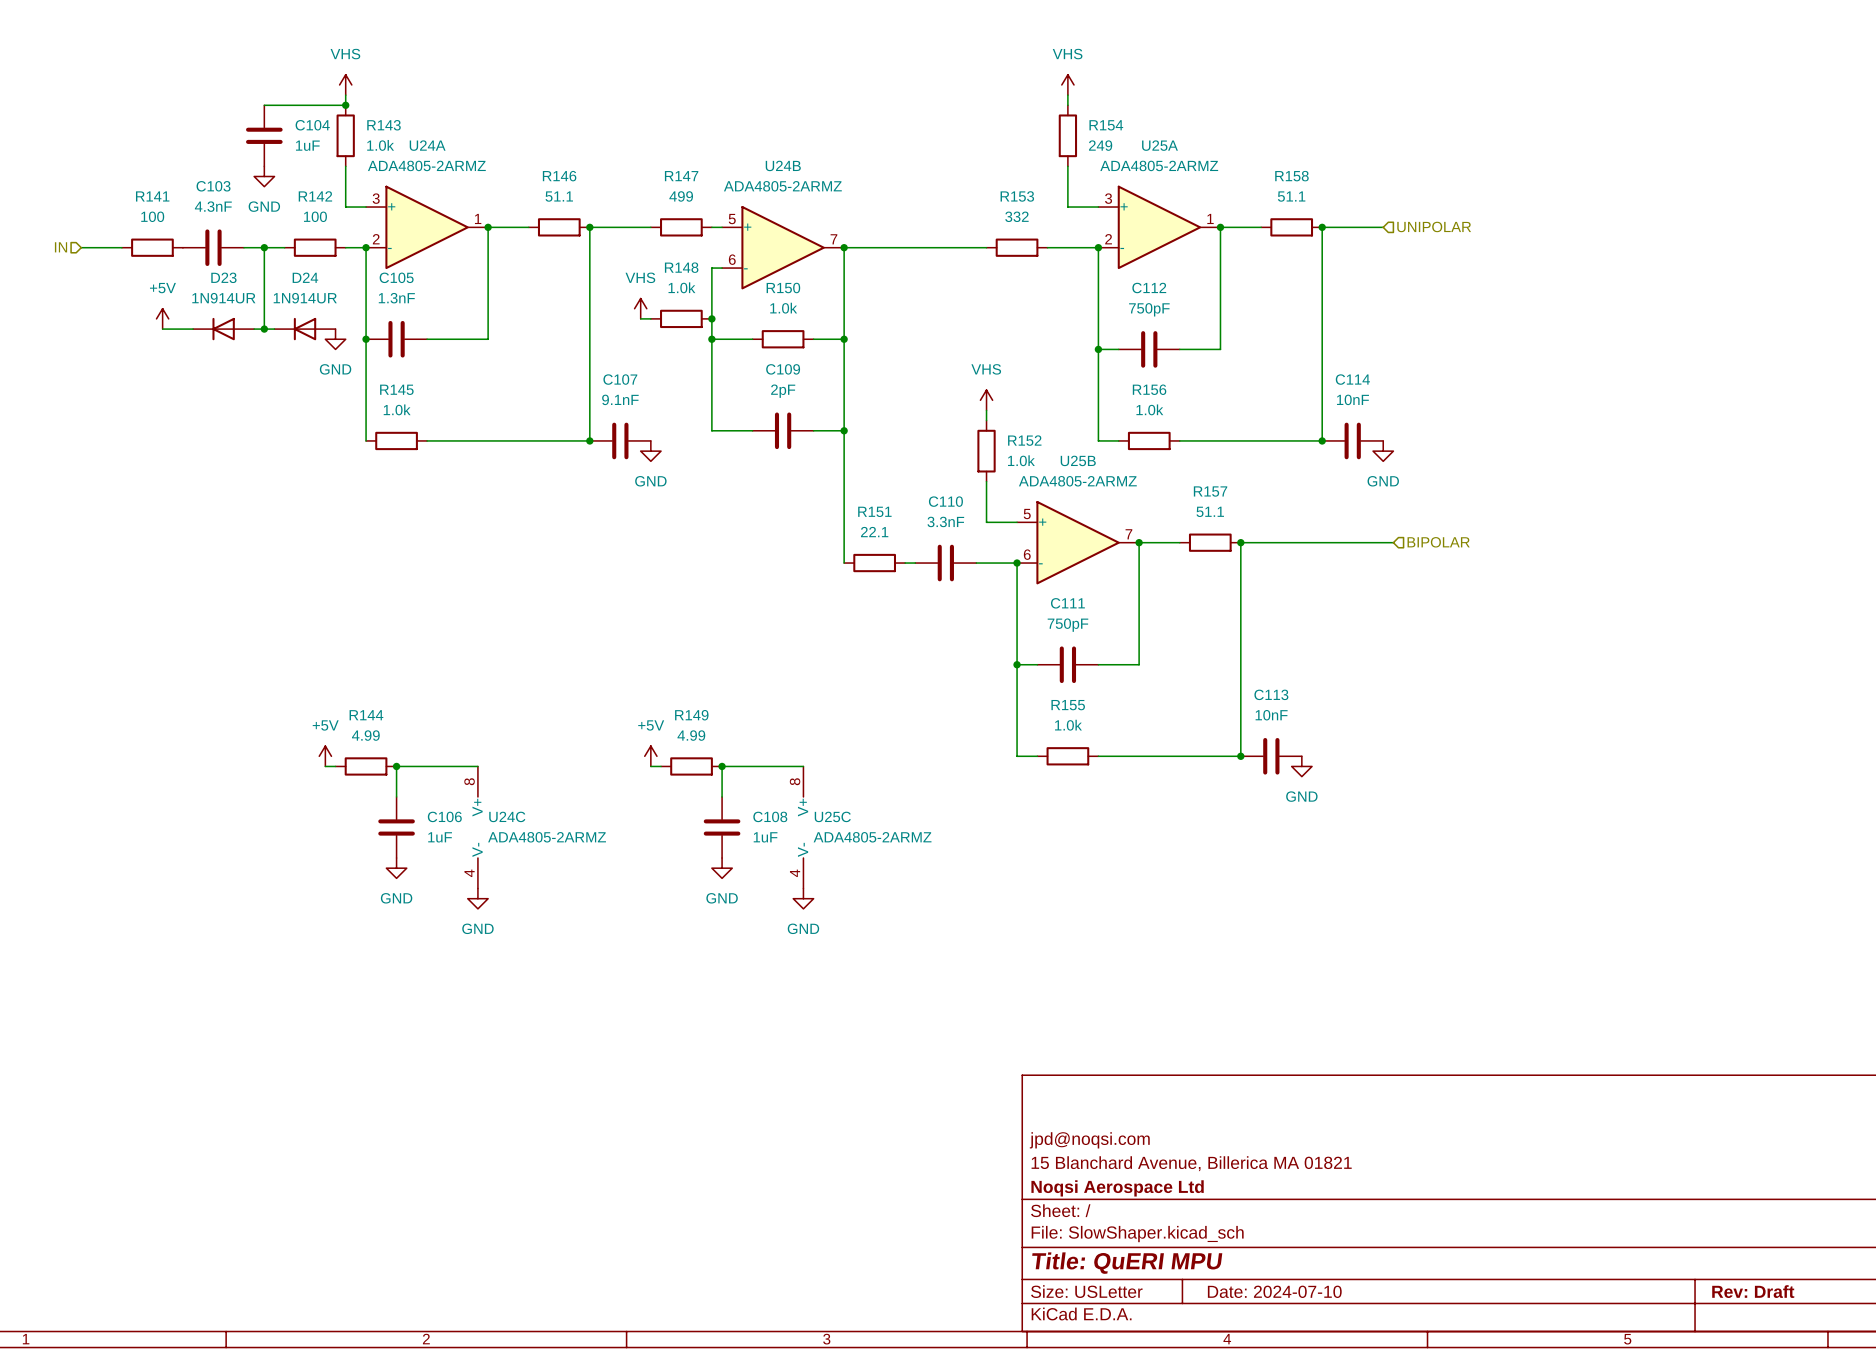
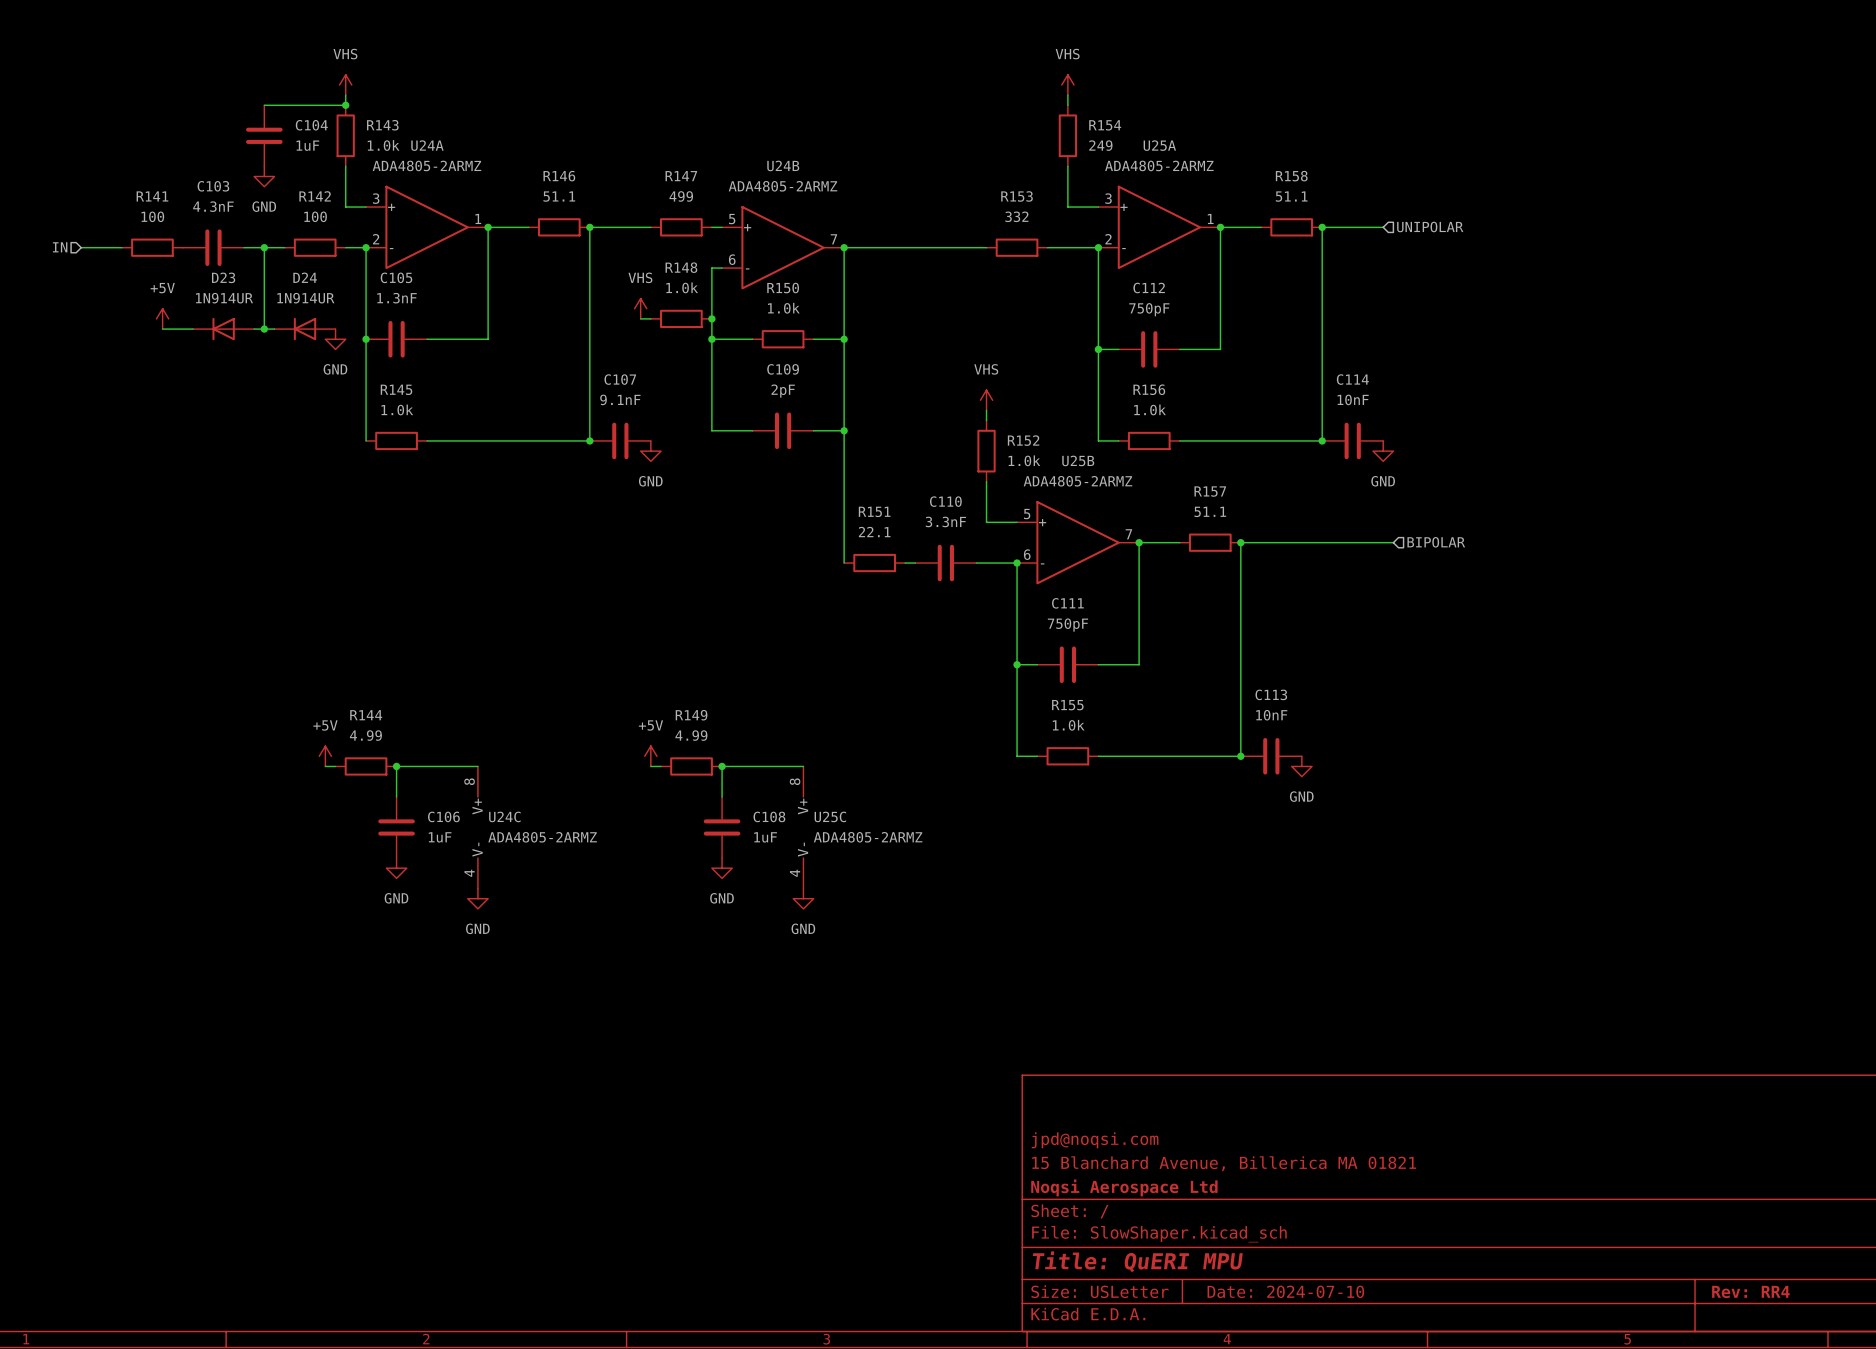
title block: Rev: Draft (1753, 1291) -> Rev: RR4 (1750, 1291)

